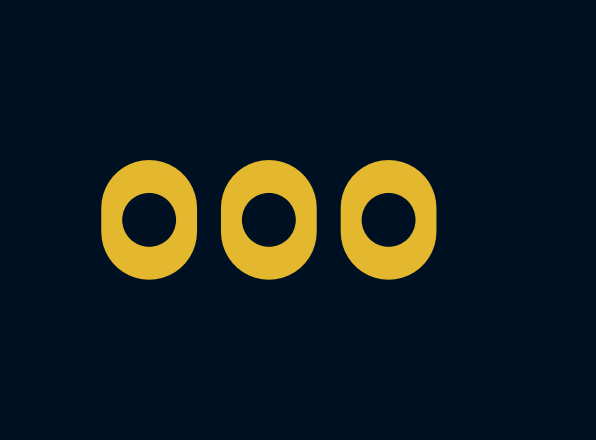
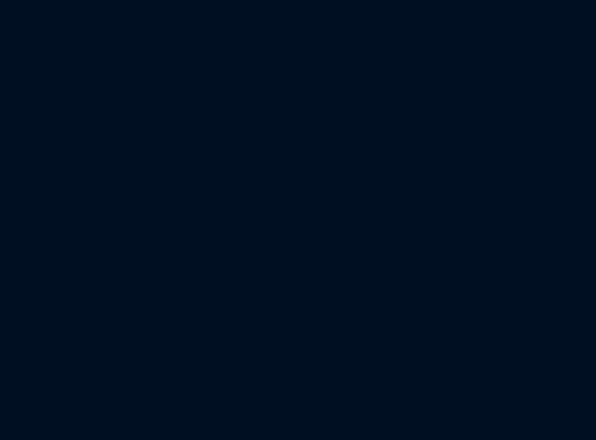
part: (268, 219) -> none

